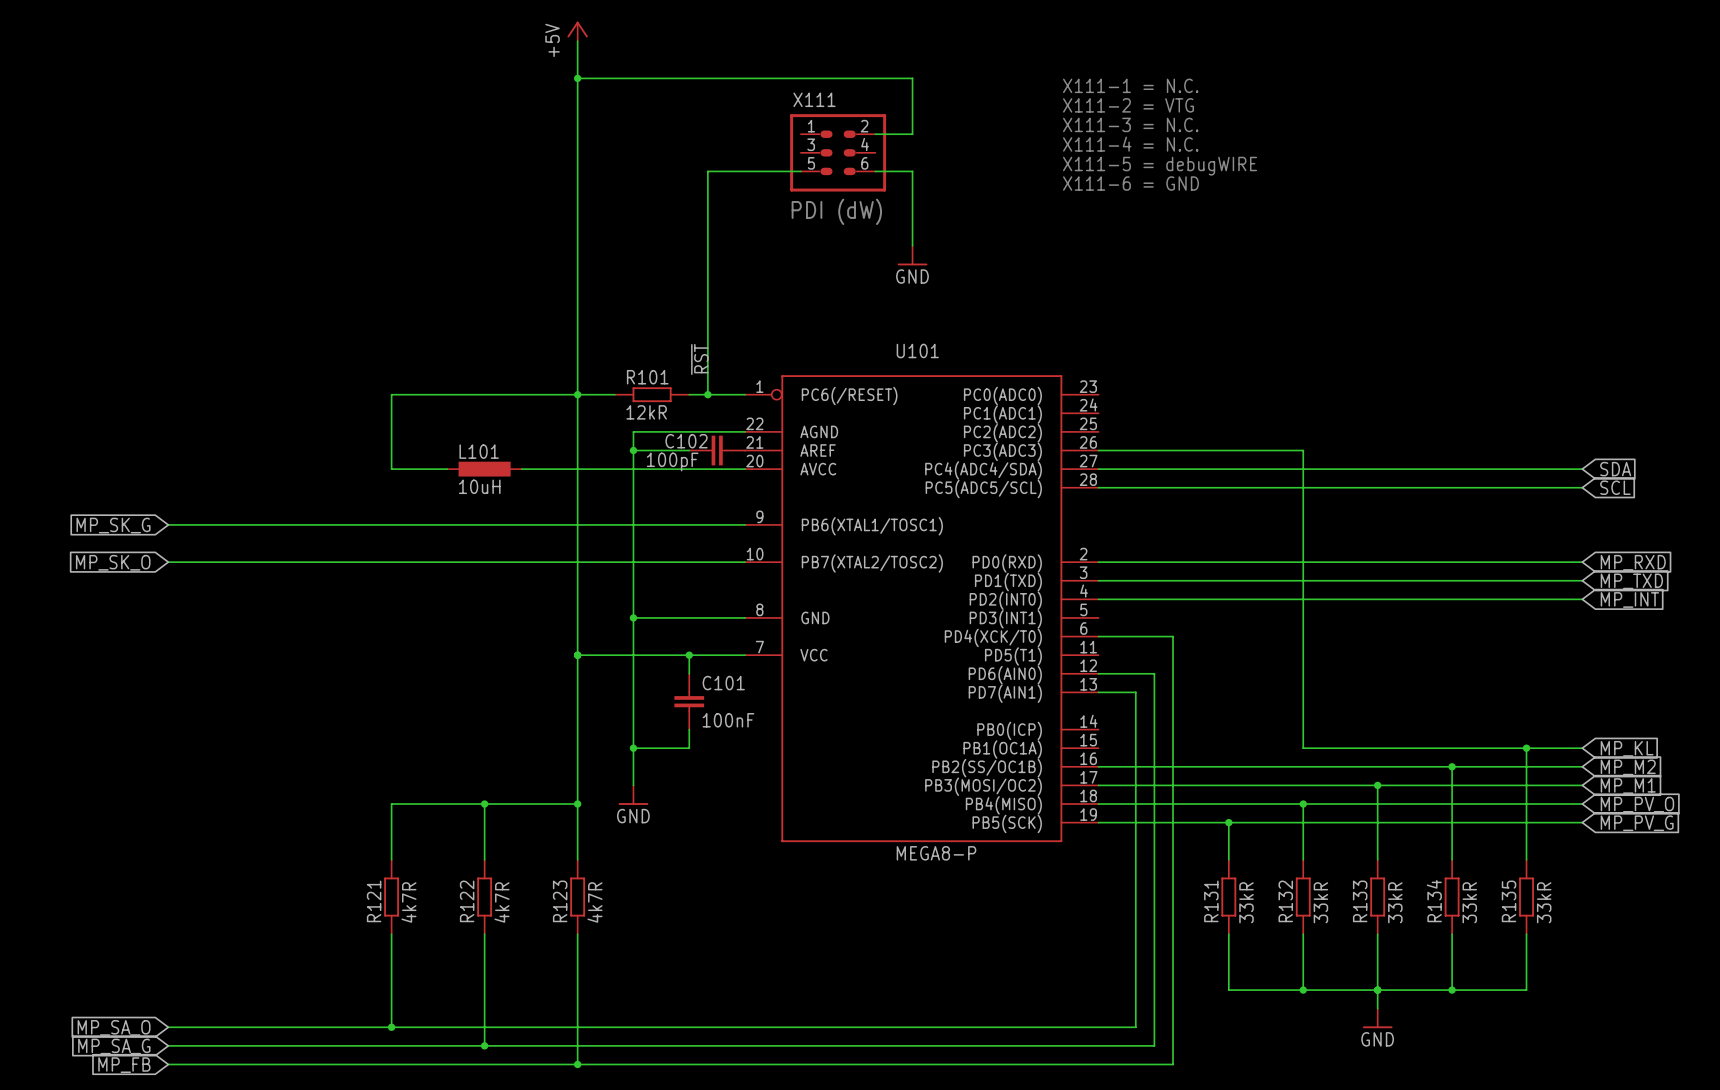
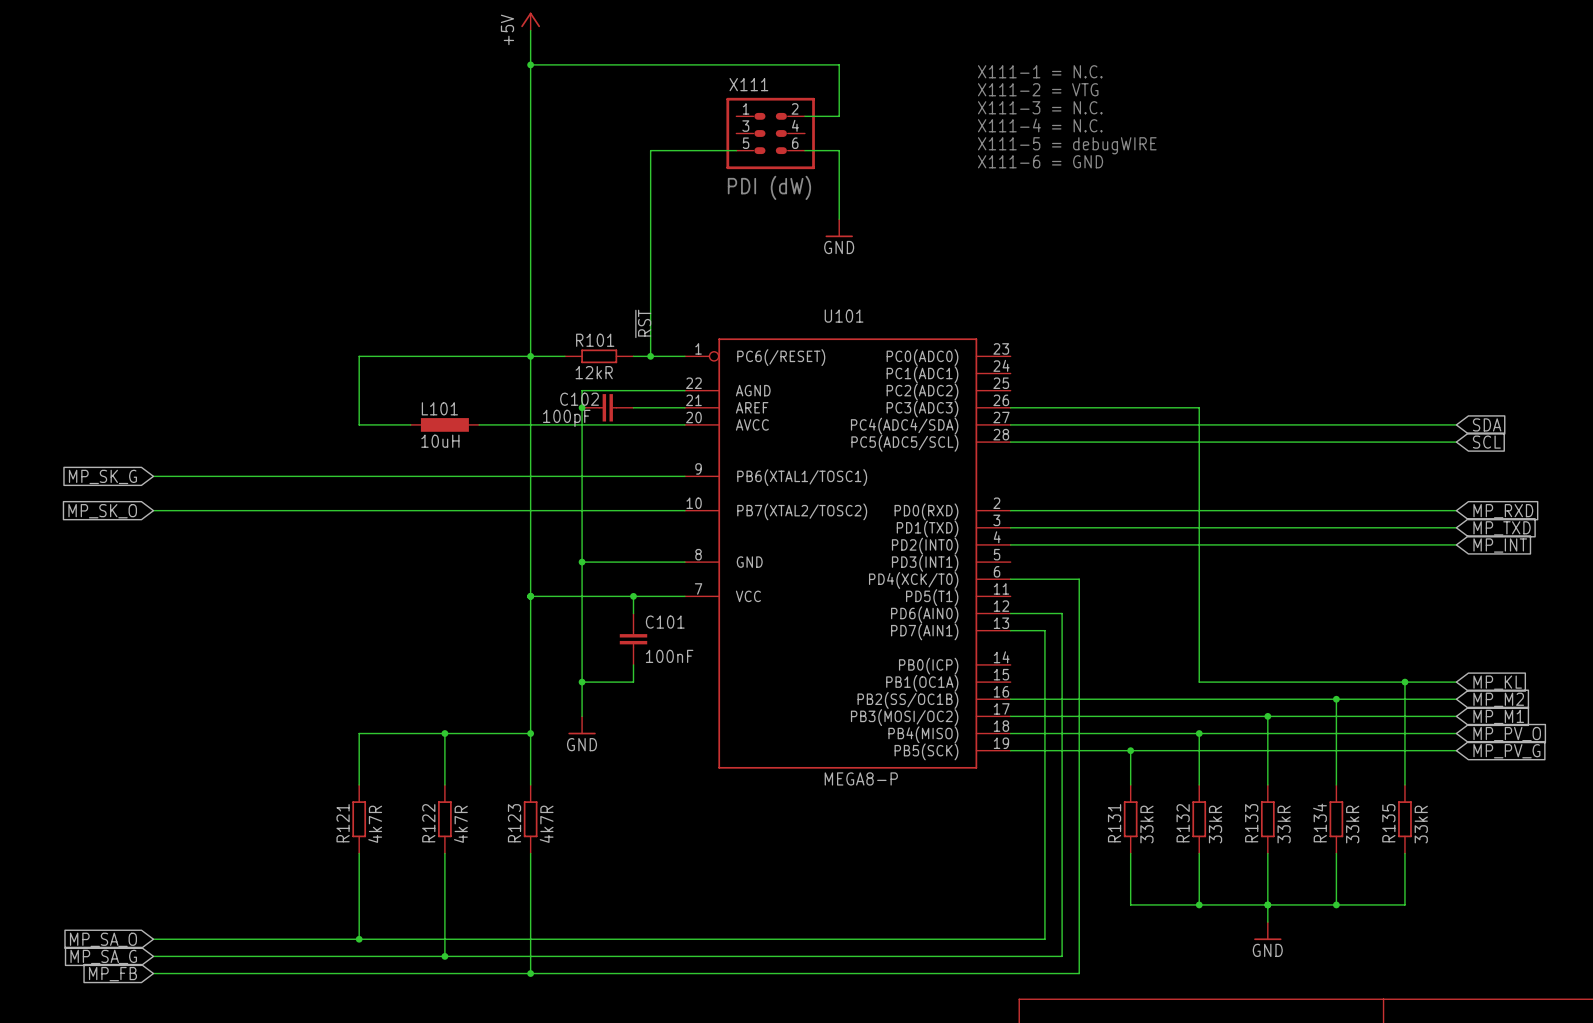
C102 position: (717, 450) -> (607, 407)

